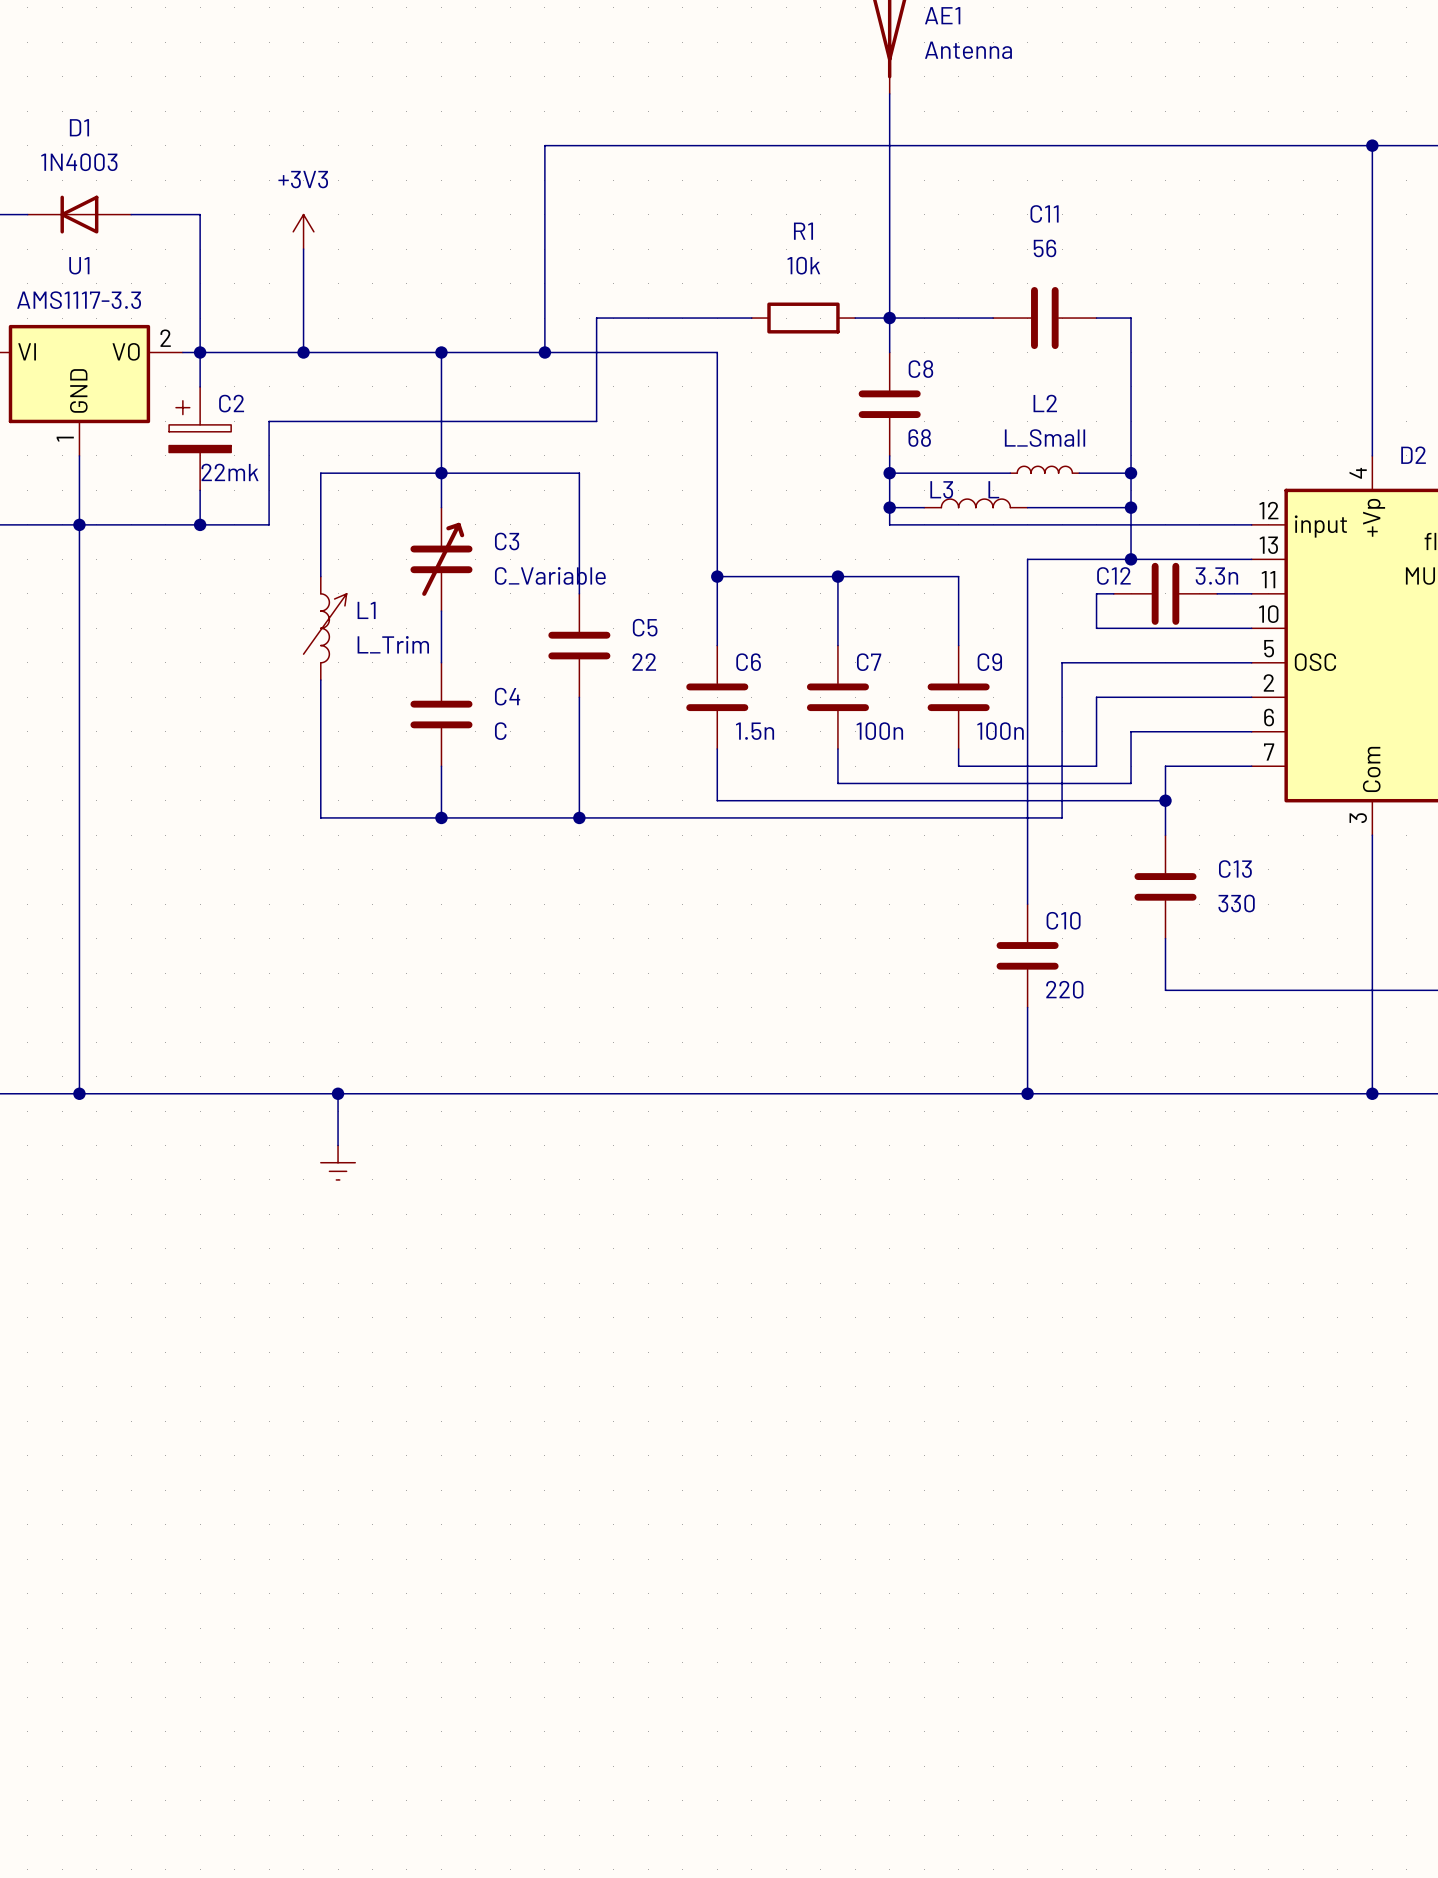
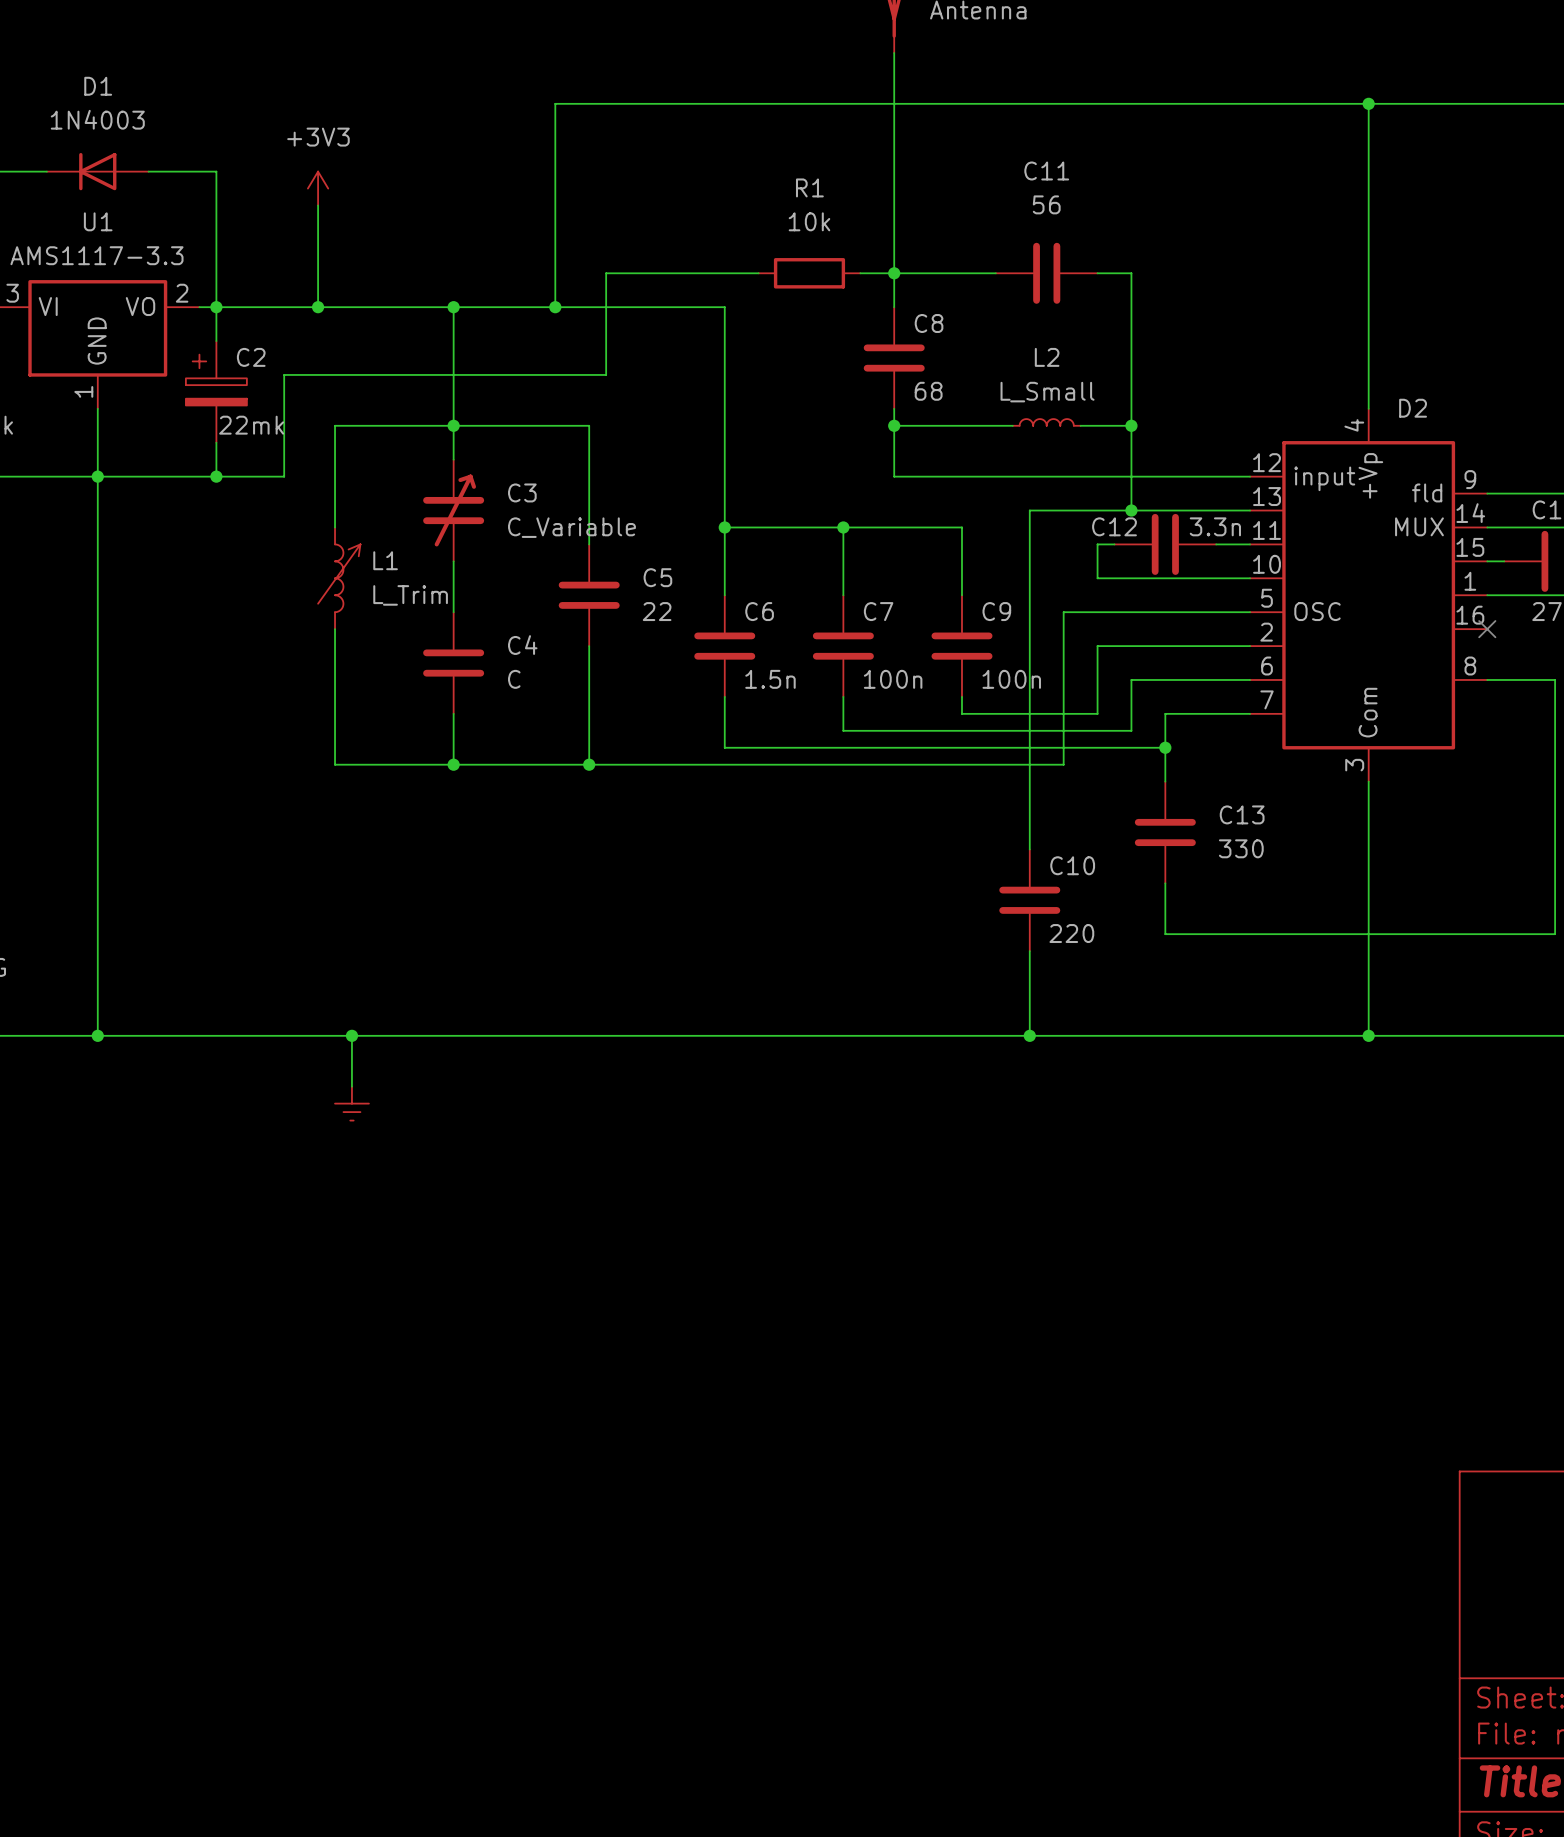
L3: L (975, 503) -> none
wire: (889, 507) (924, 507) -> none
junction: (889, 507) -> none
wire: (1027, 507) (1131, 507) -> none
junction: (1131, 507) -> none

